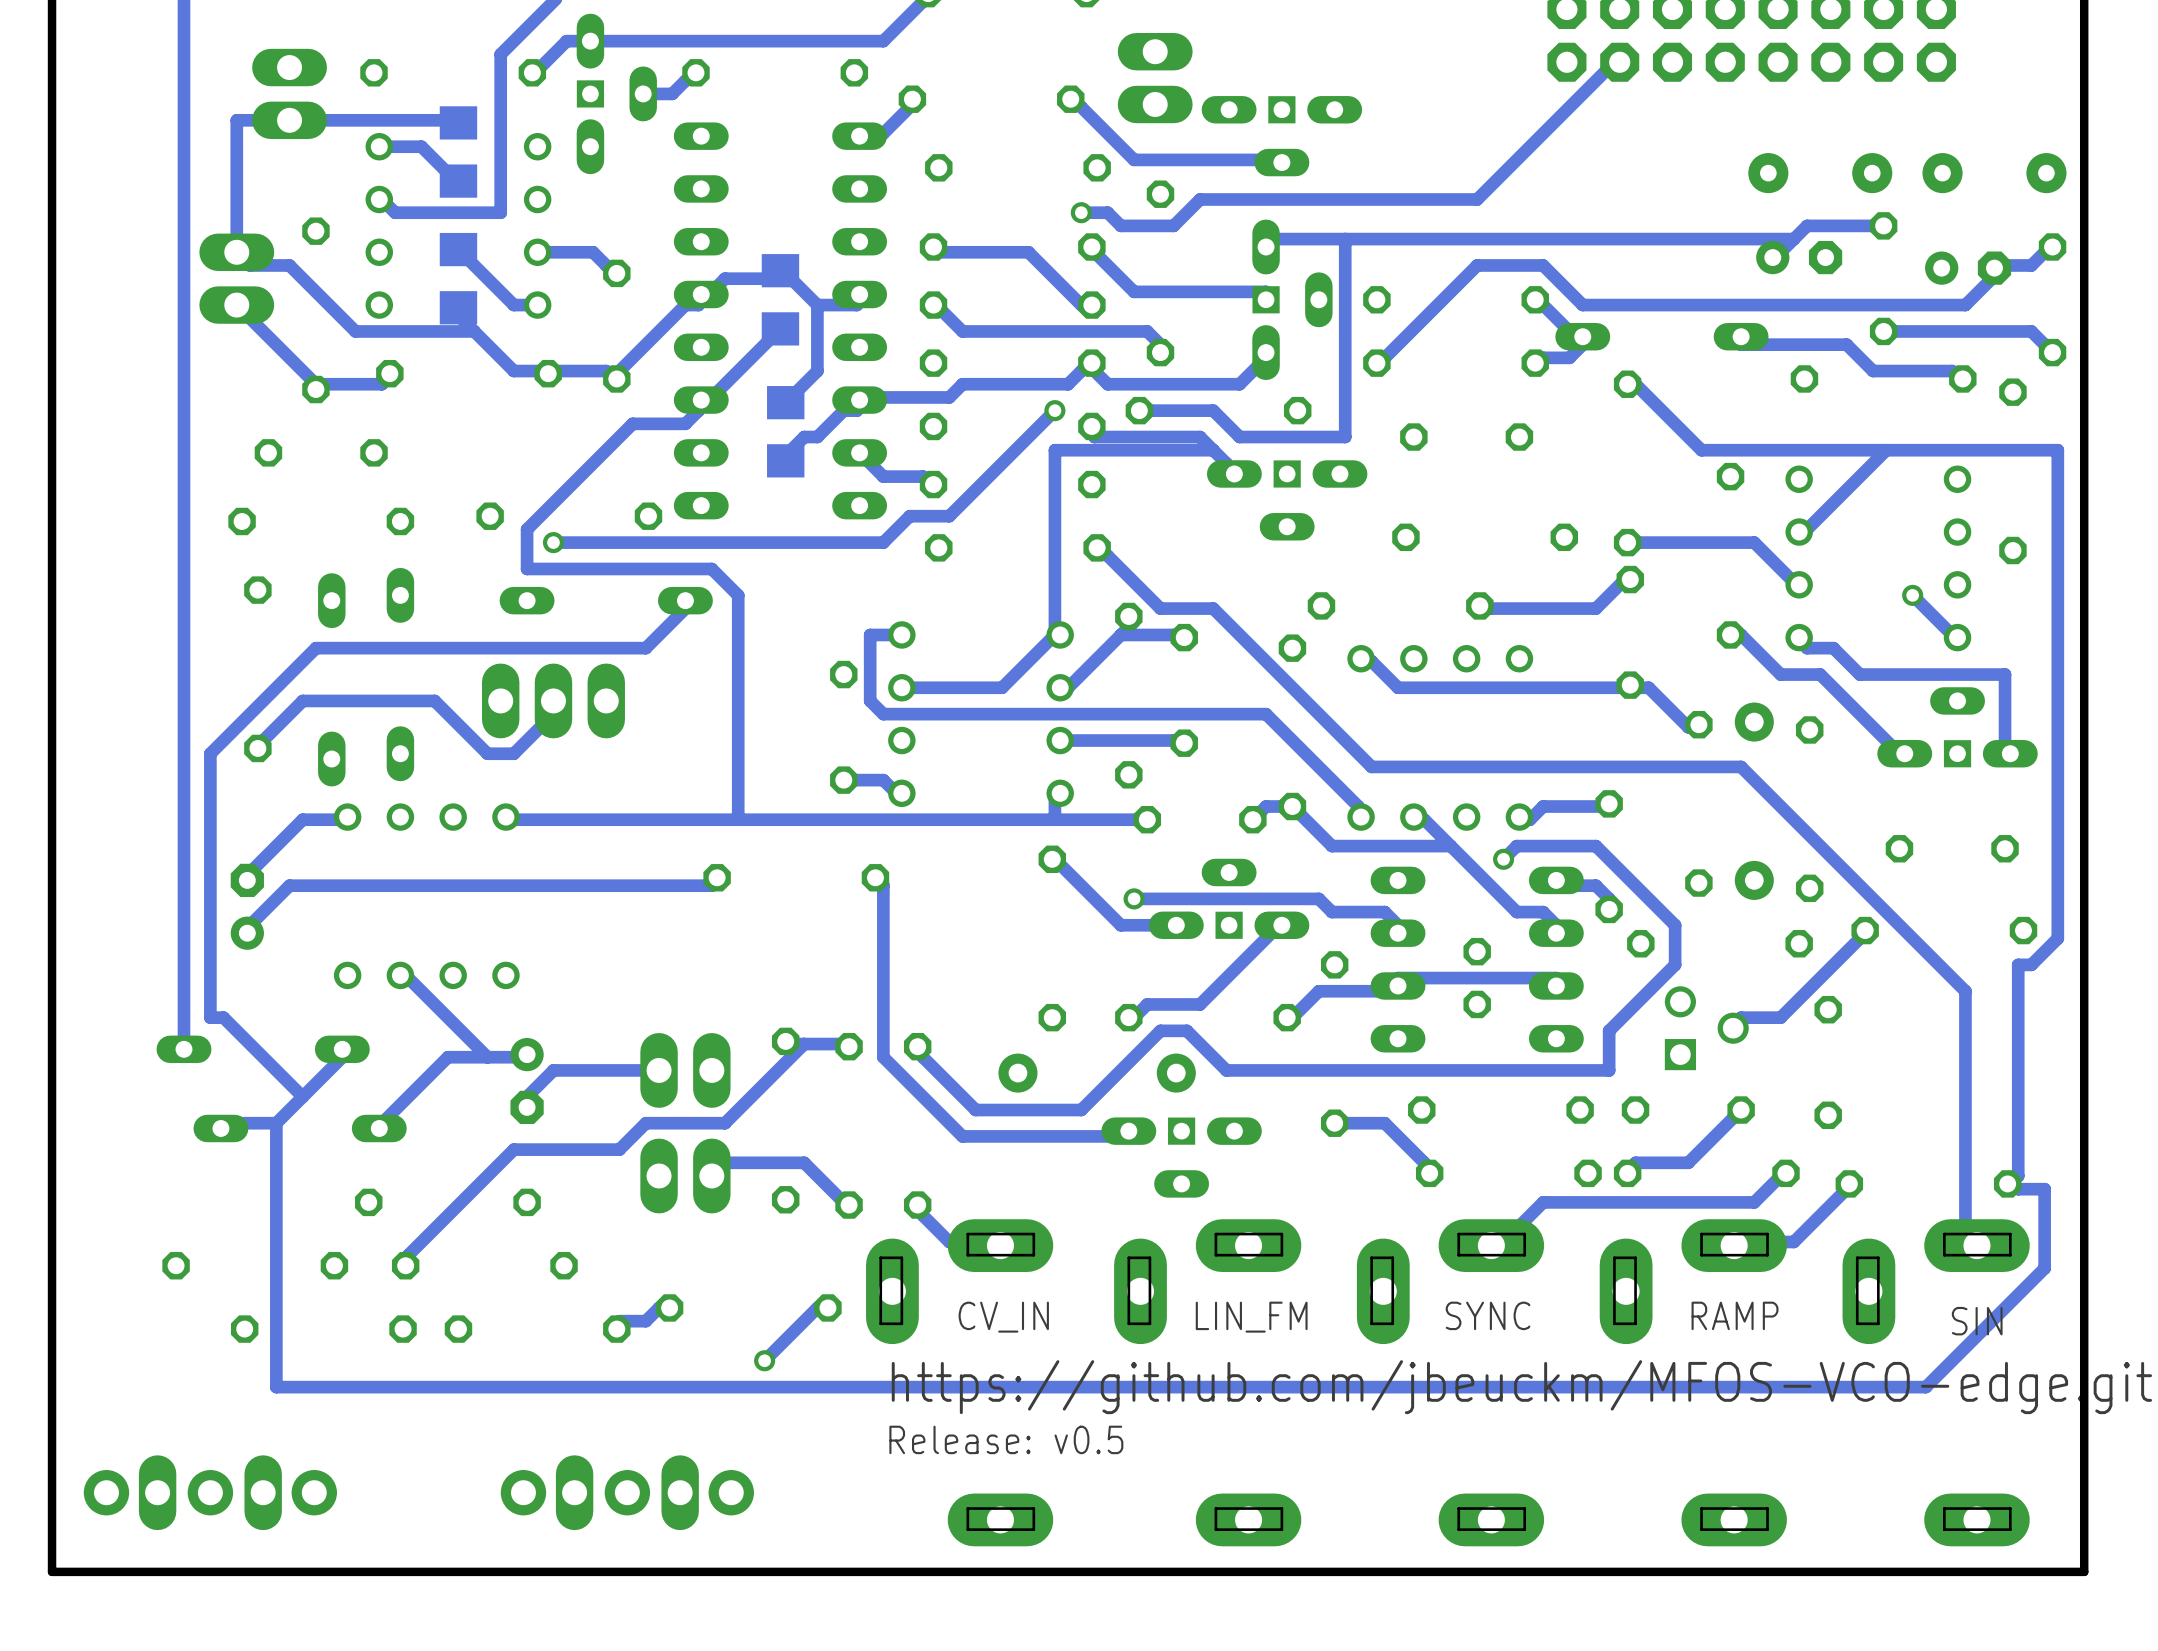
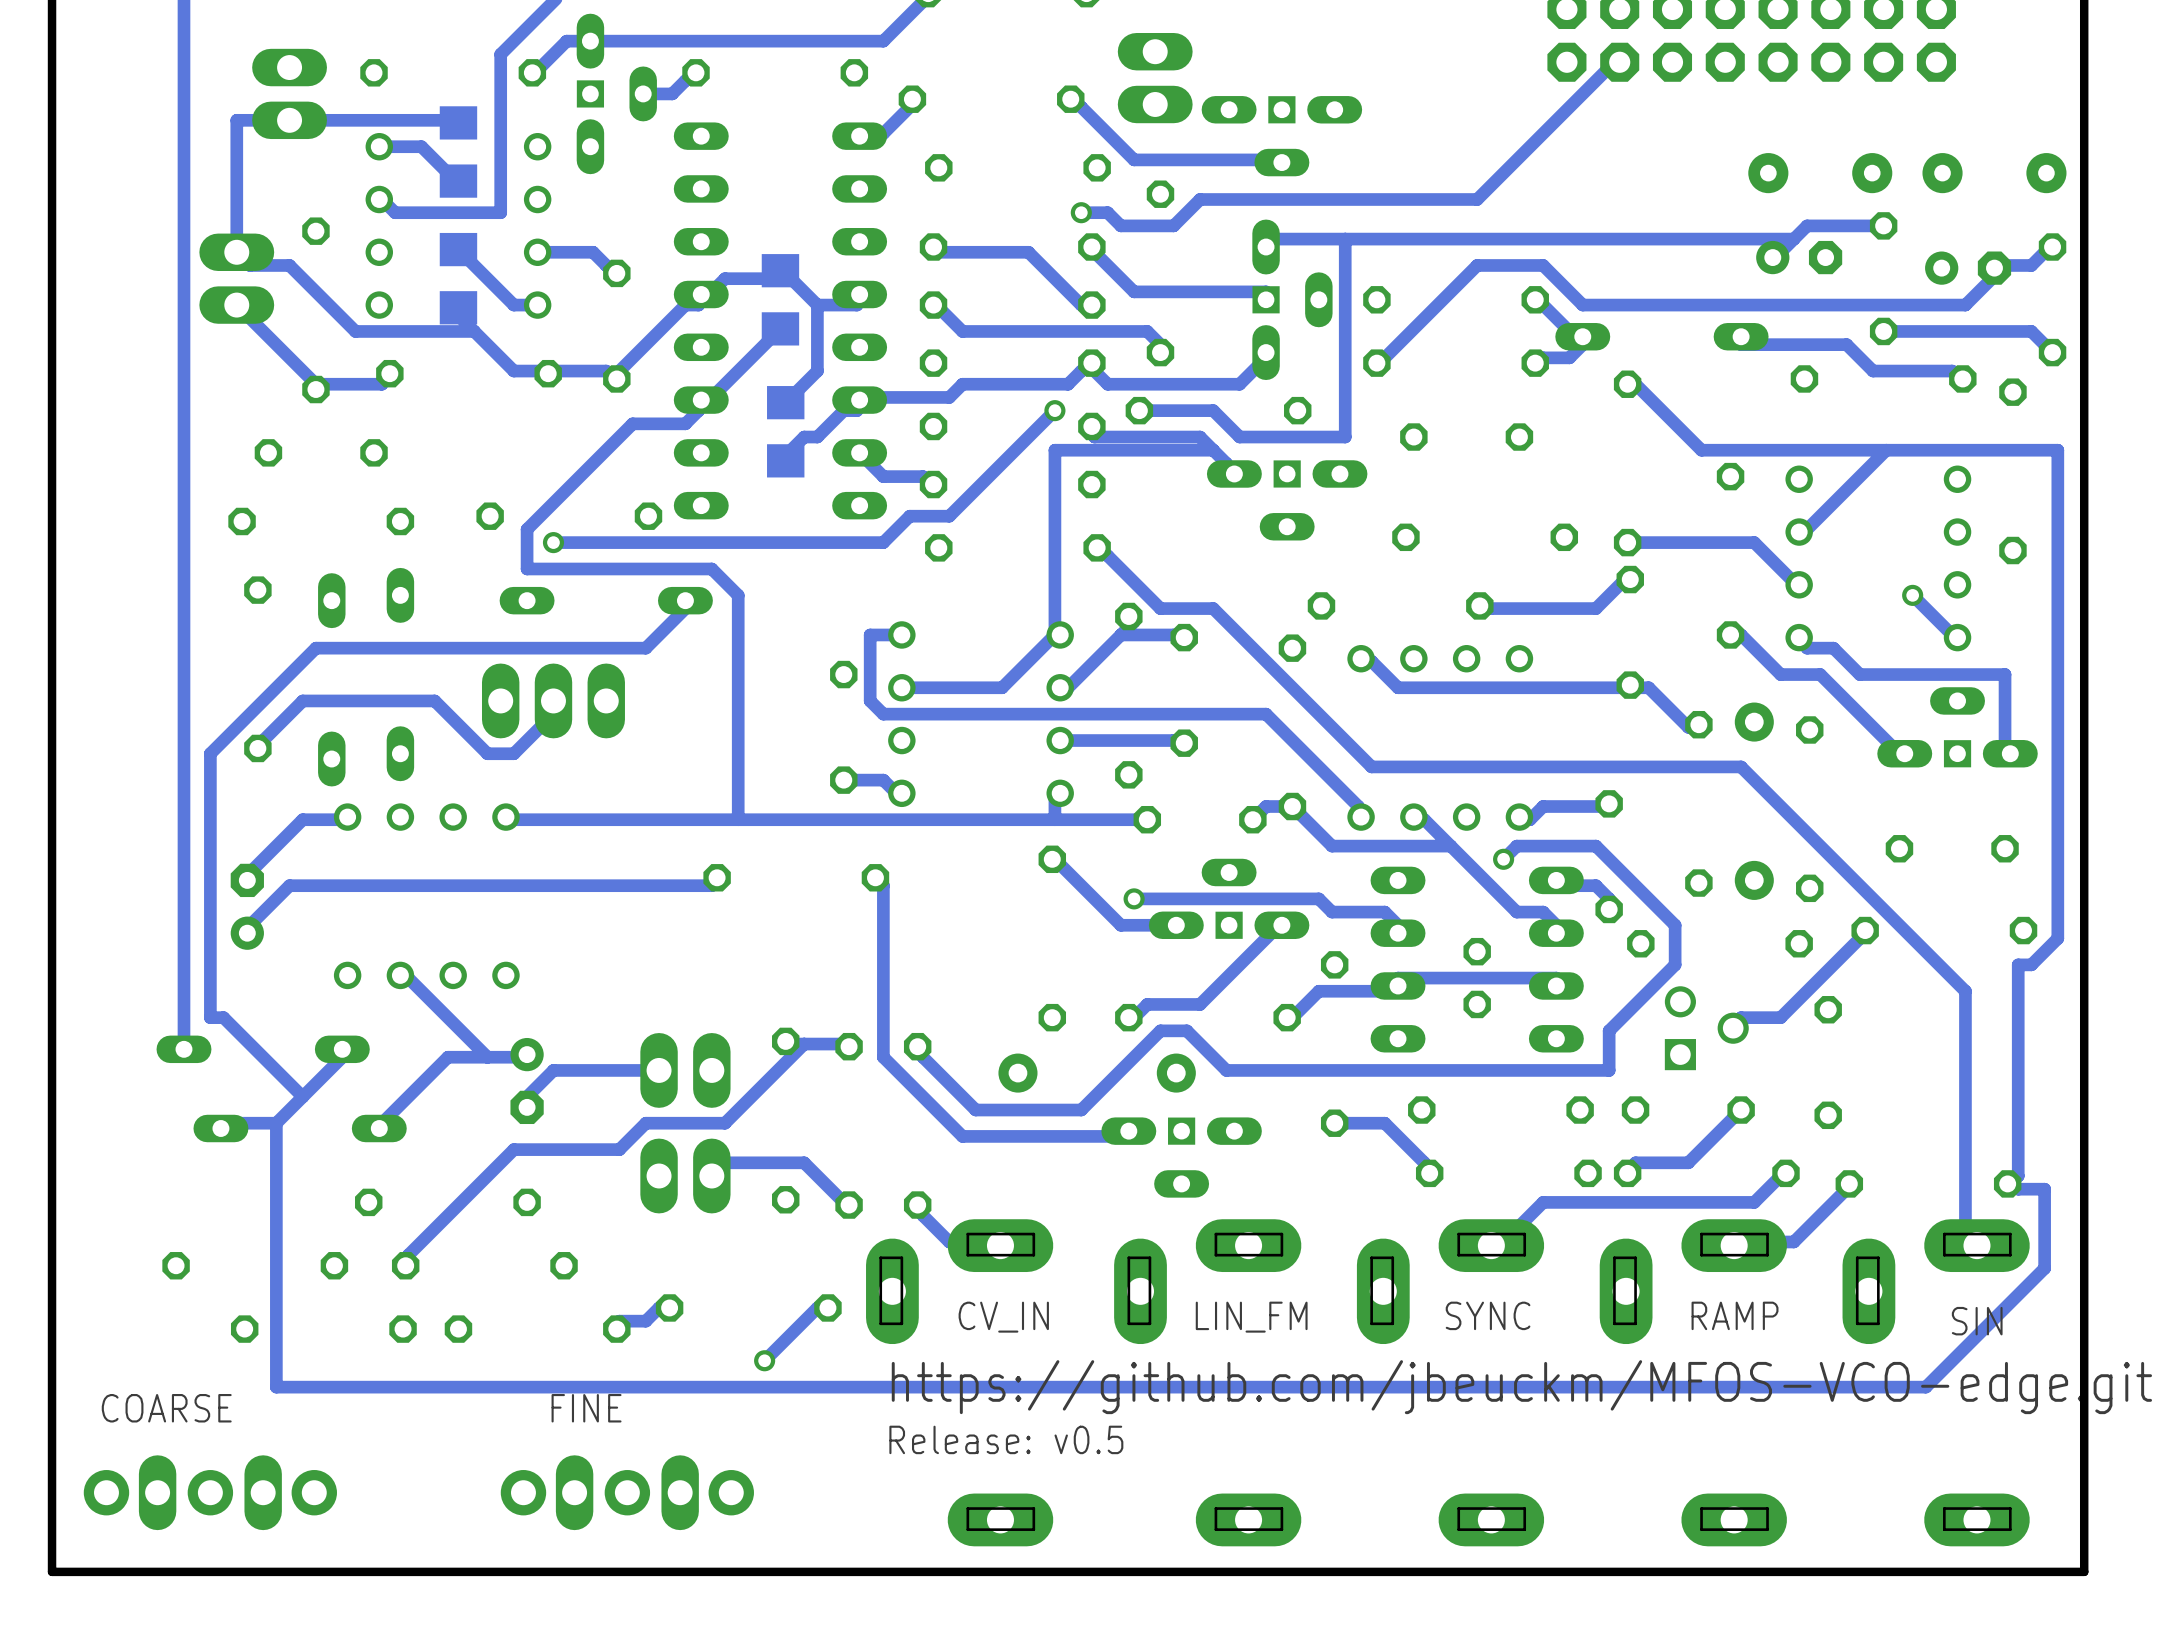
COARSE name: none -> COARSE (166, 1408)
FINE name: none -> FINE (586, 1408)

